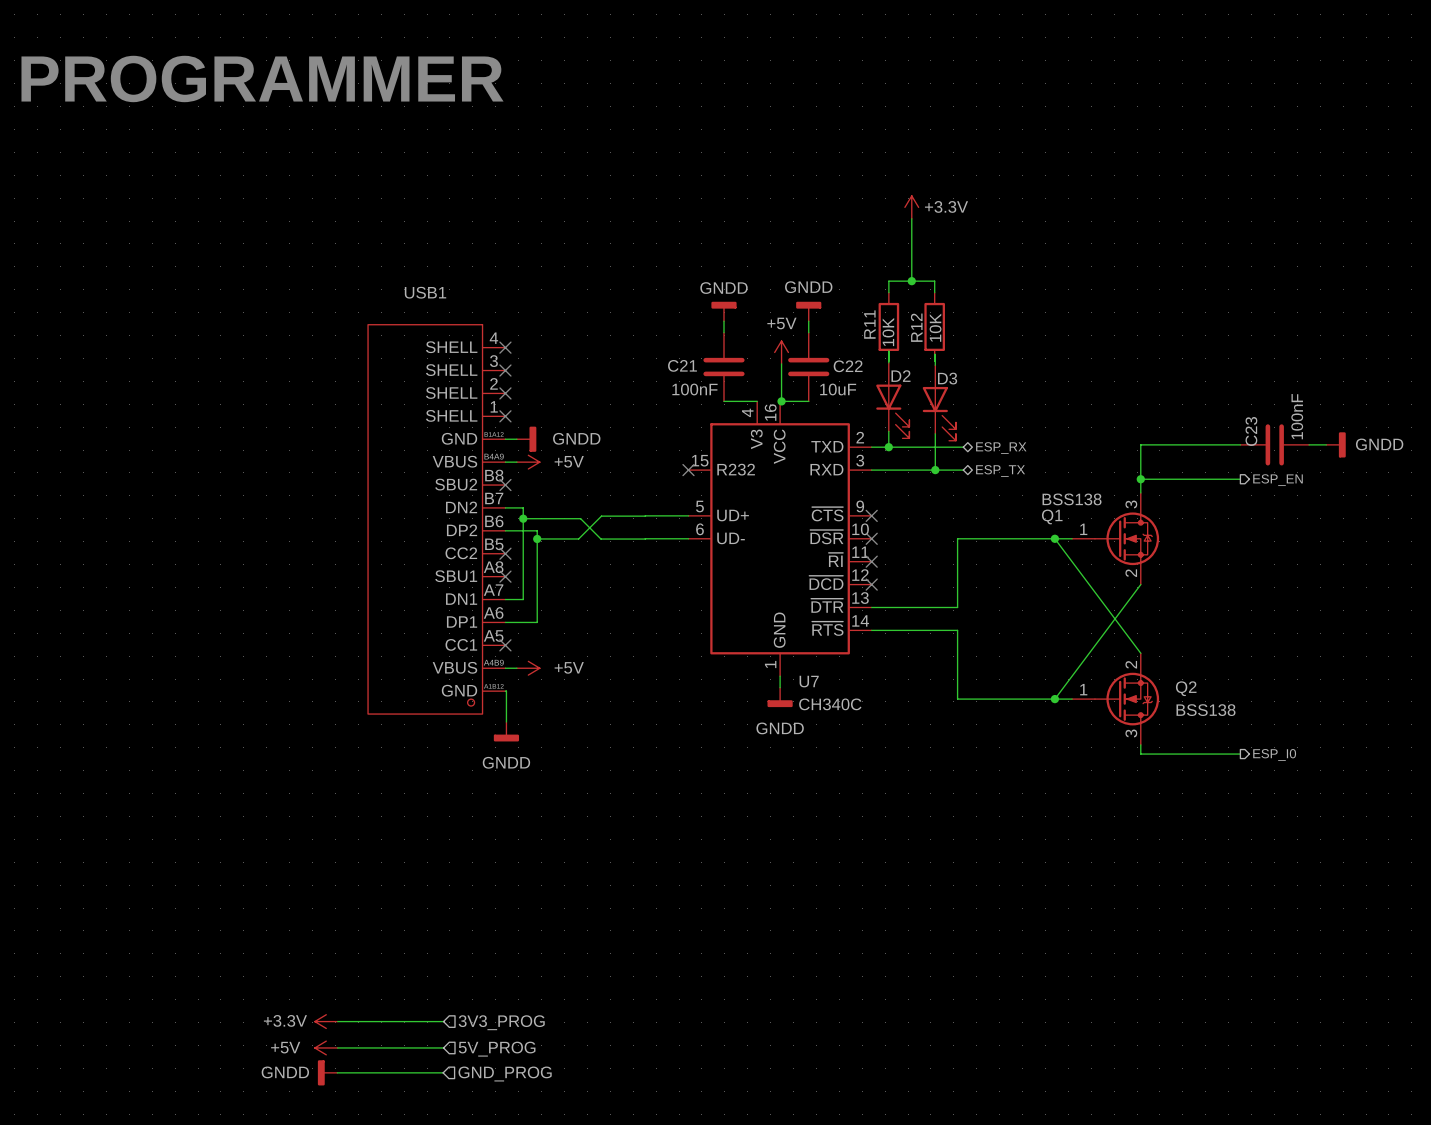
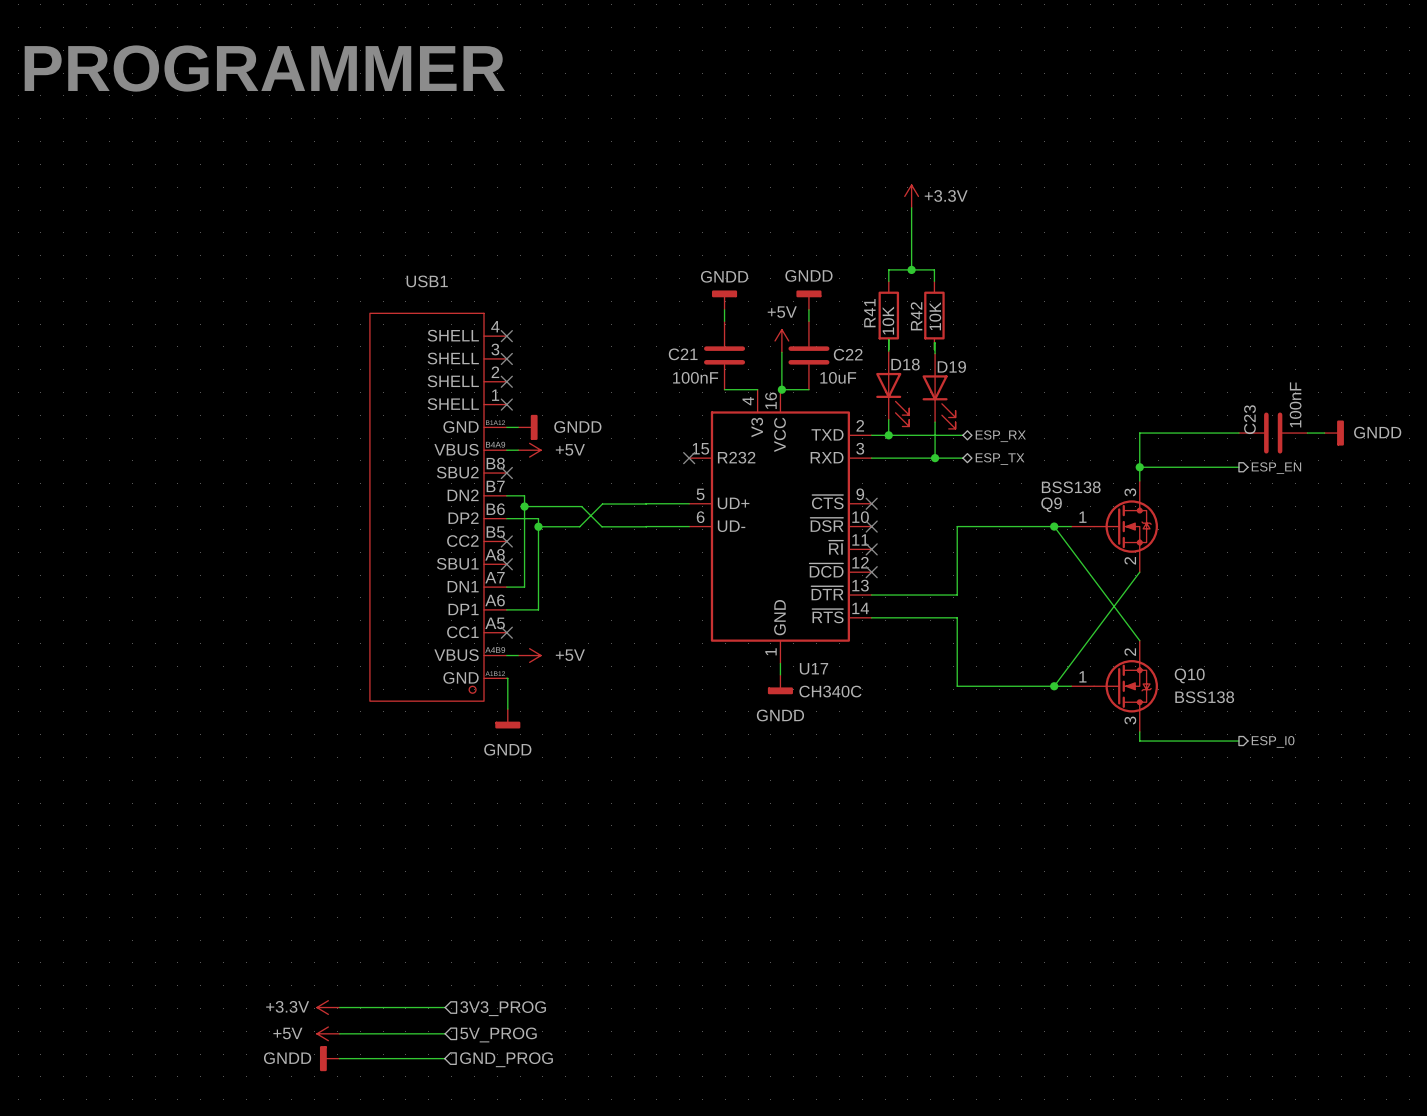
R11 name: R11 (869, 324) -> R41 (869, 313)
R12 name: R12 (916, 327) -> R42 (916, 316)
D2 name: D2 (900, 376) -> D18 (905, 364)
D3 name: D3 (947, 378) -> D19 (951, 366)
Q1 name: Q1 (1052, 516) -> Q9 (1051, 504)
U7 name: U7 (809, 681) -> U17 (814, 668)
Q2 name: Q2 (1186, 688) -> Q10 (1189, 675)

